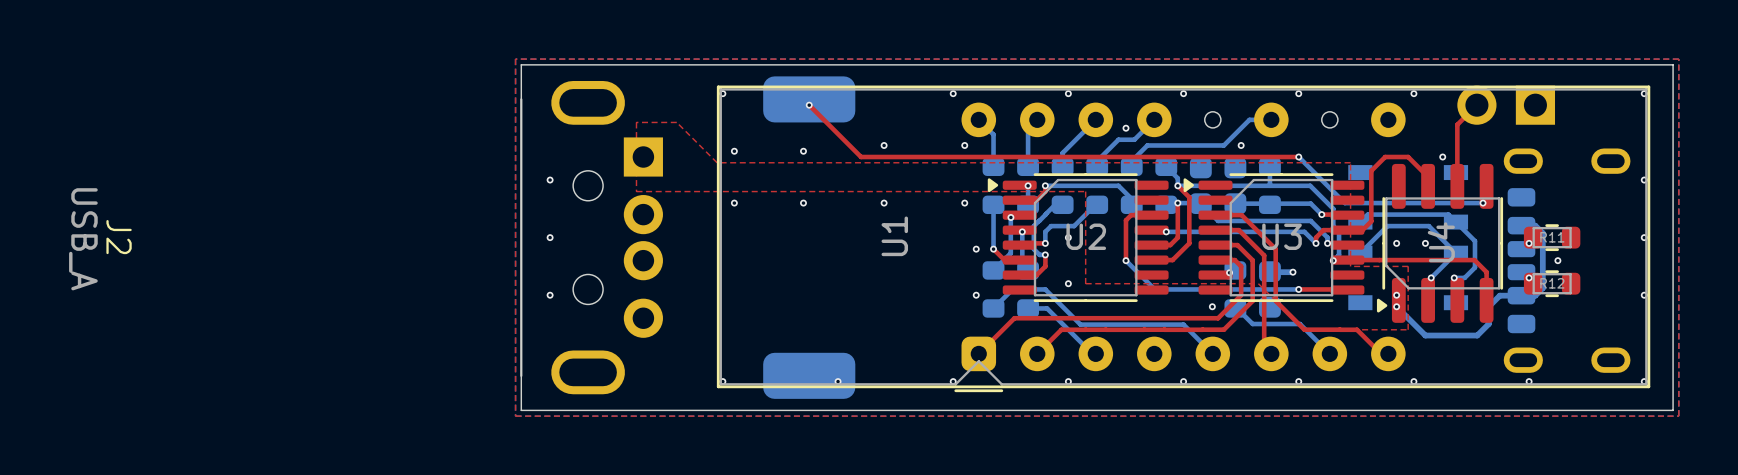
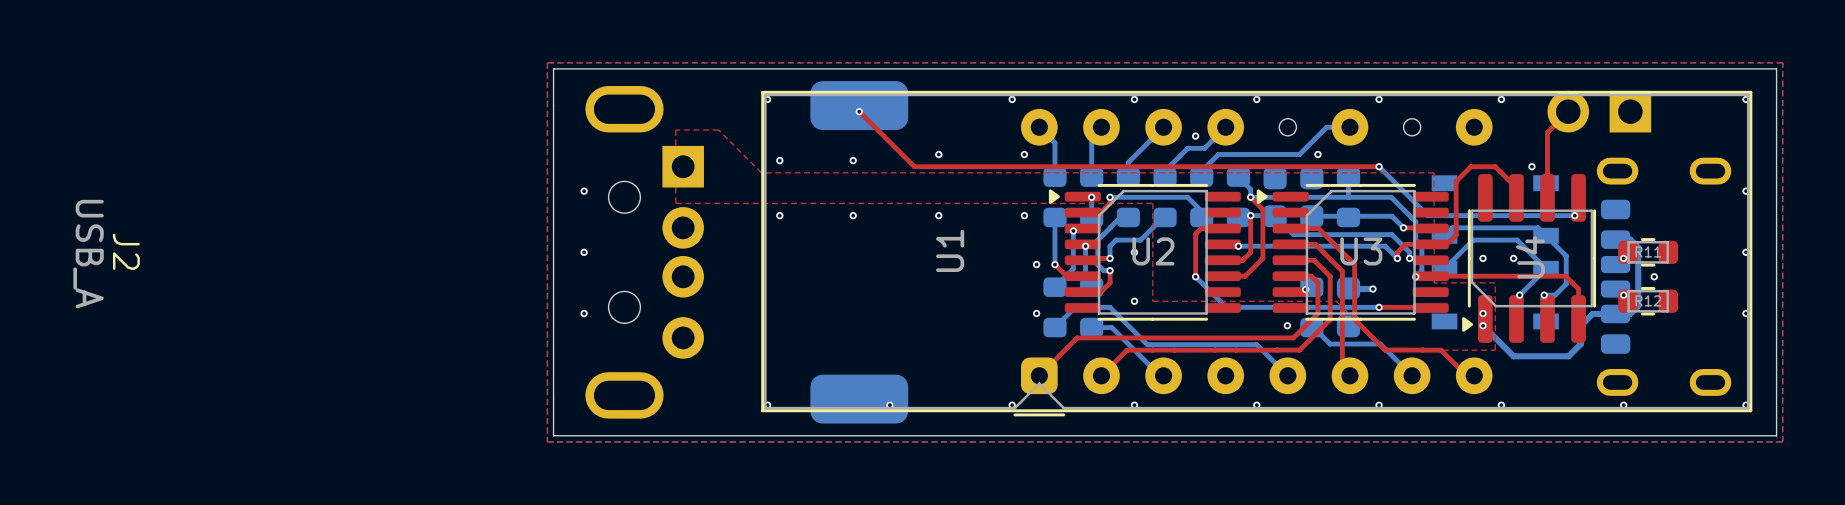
J2 footprint: [520, 80, 663, 395] -> [552, 86, 704, 419]

